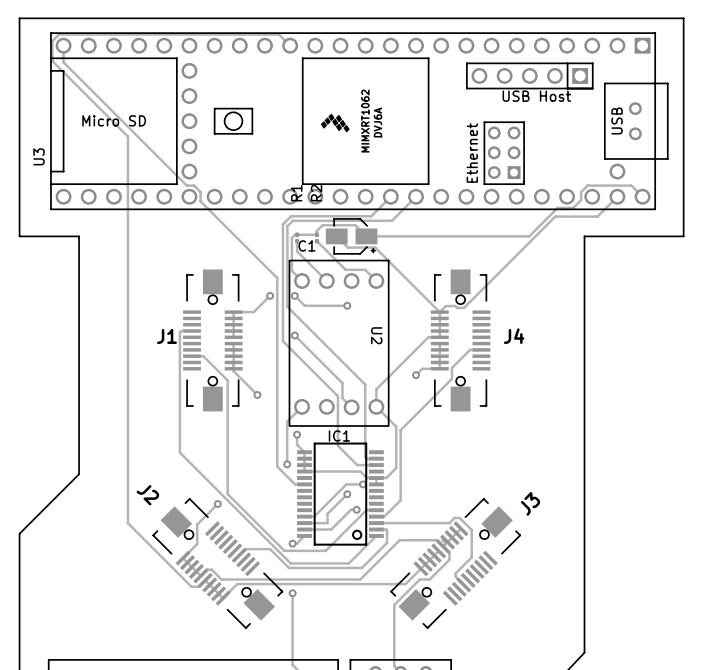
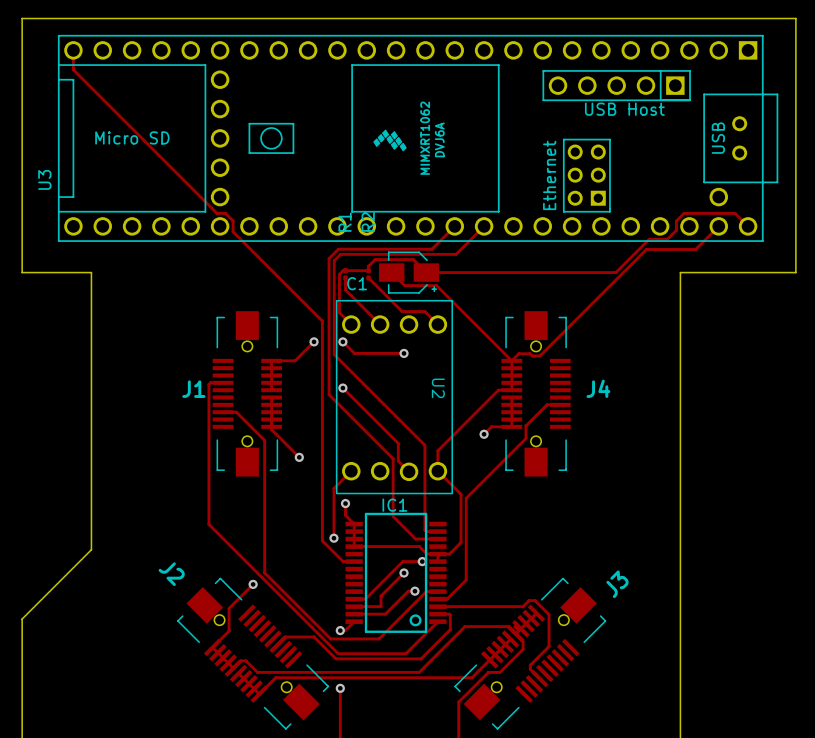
track: (290, 45) (278, 34) (58, 34) (52, 41) (52, 61) (127, 136) (127, 523) (191, 586) (198, 586) (205, 580) -> none

